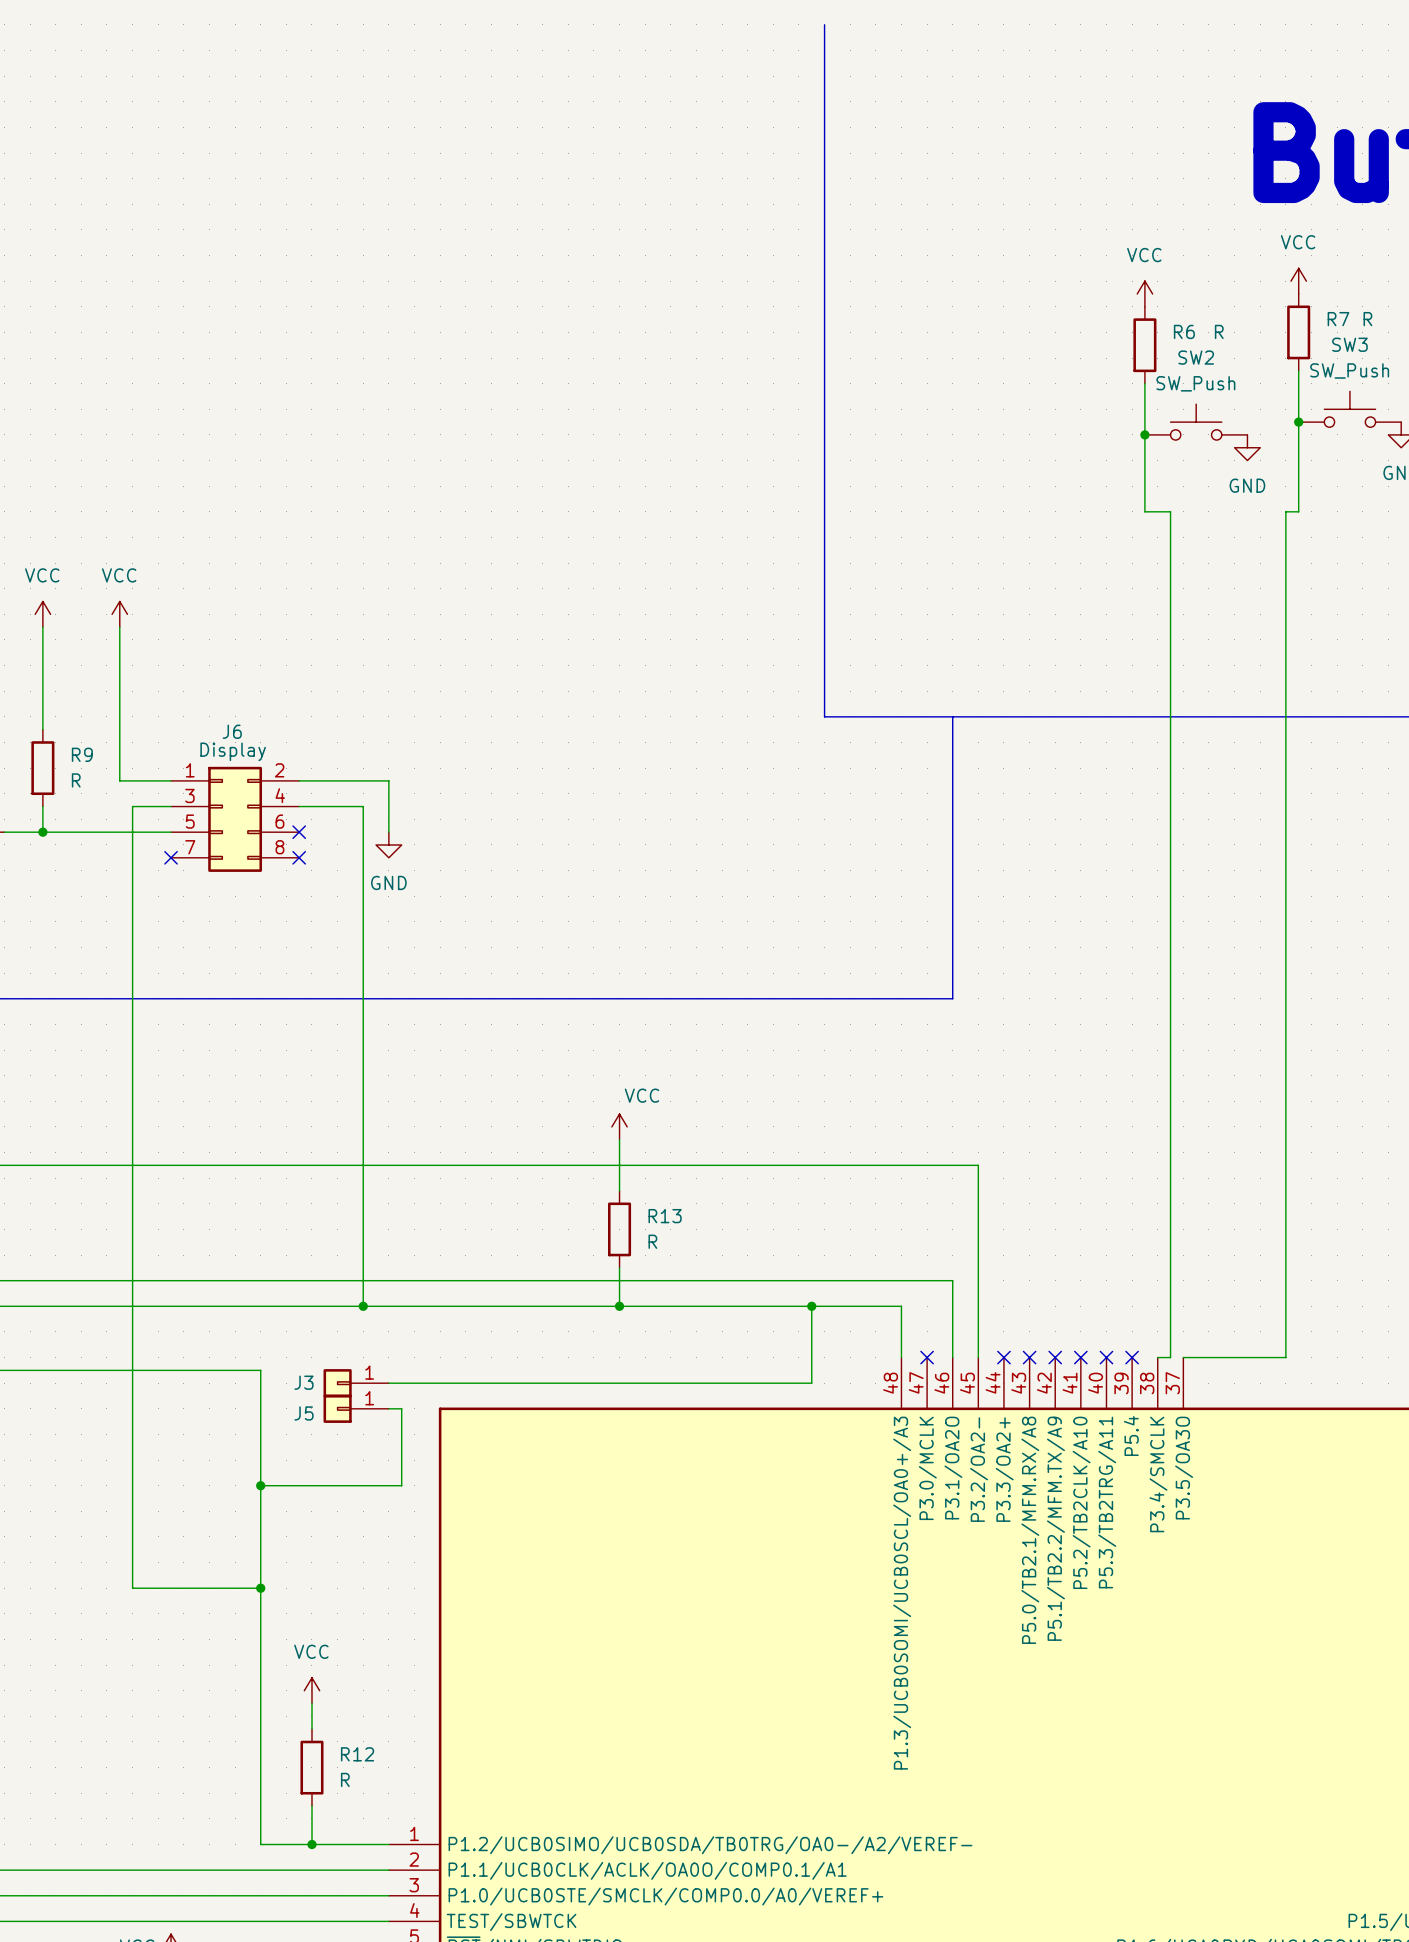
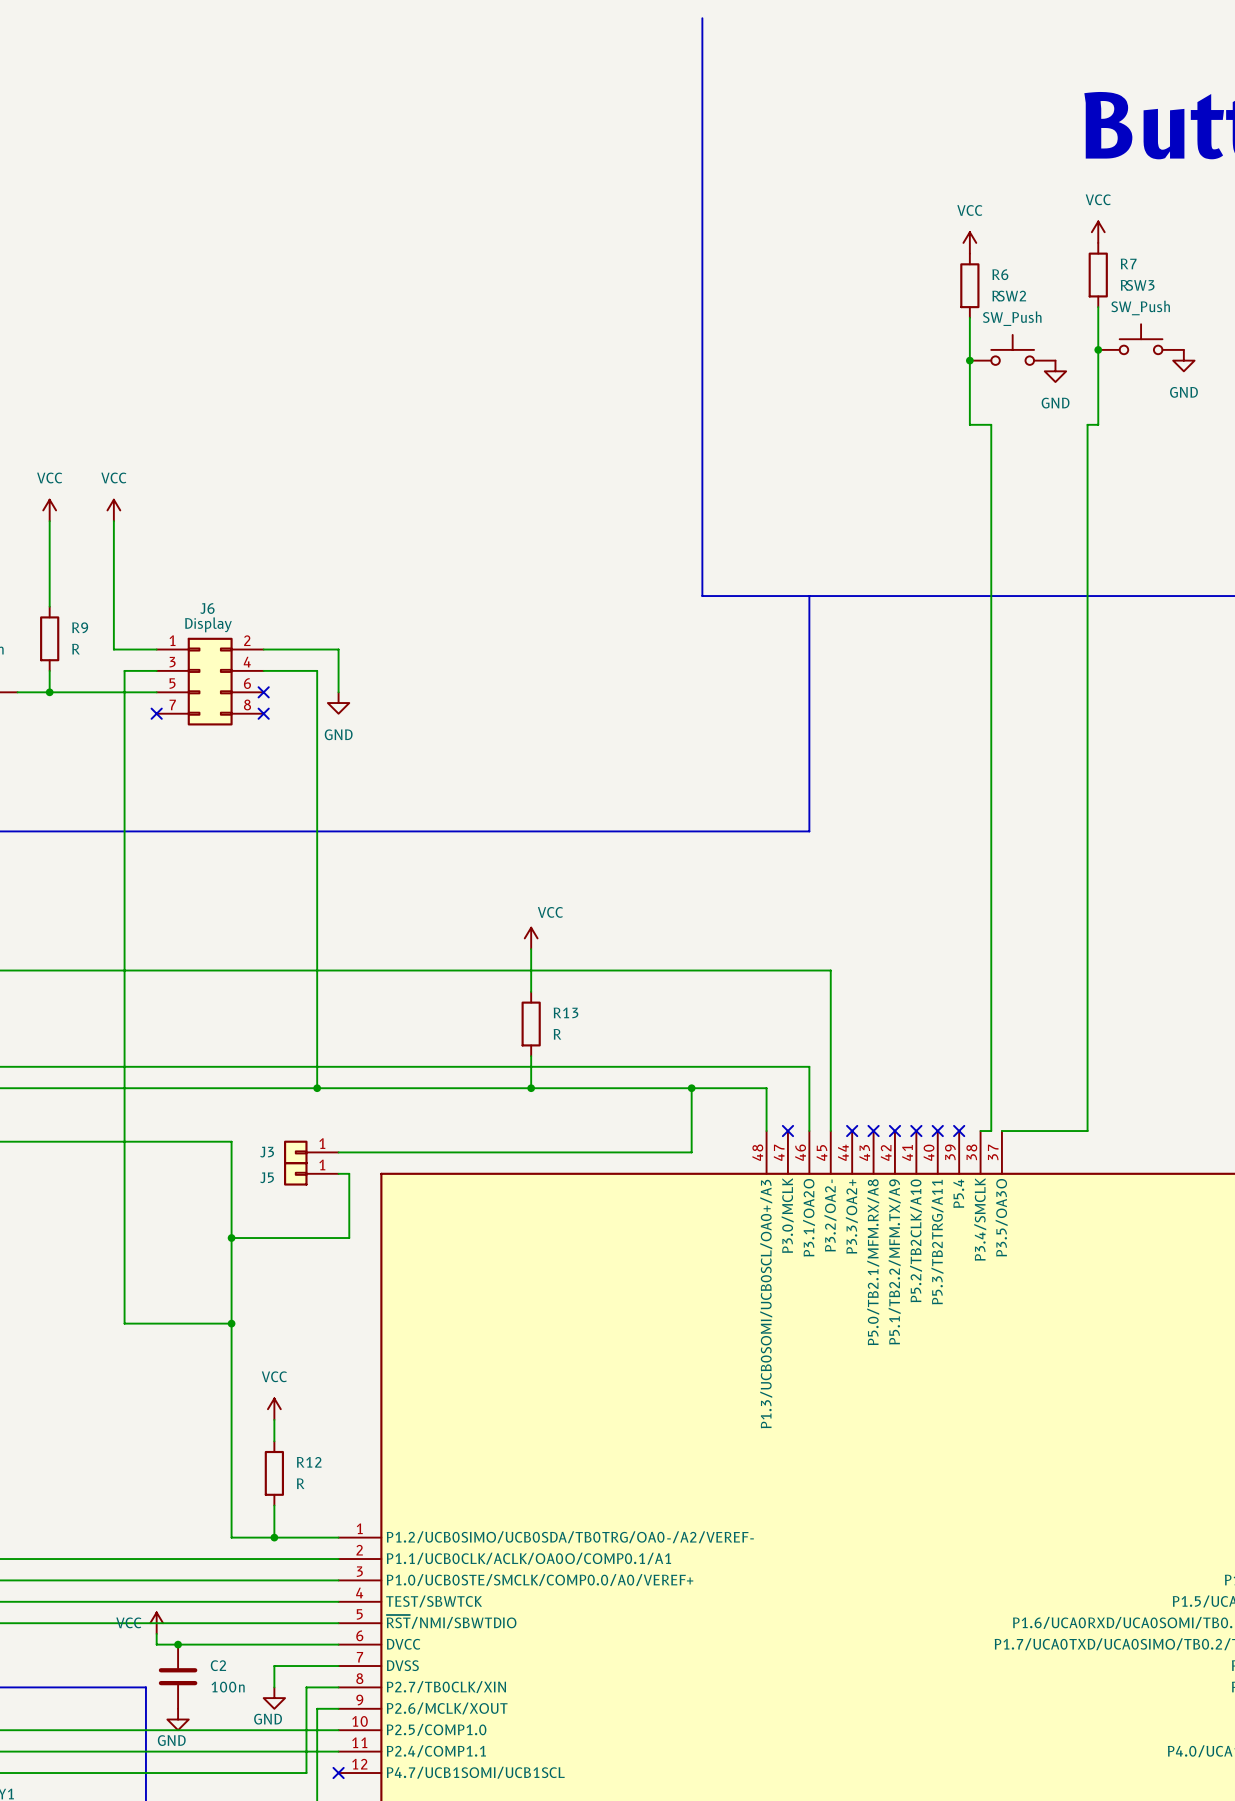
R7 value position: R (1367, 319) -> R (1124, 285)
R6 value position: R (1219, 331) -> R (996, 296)

